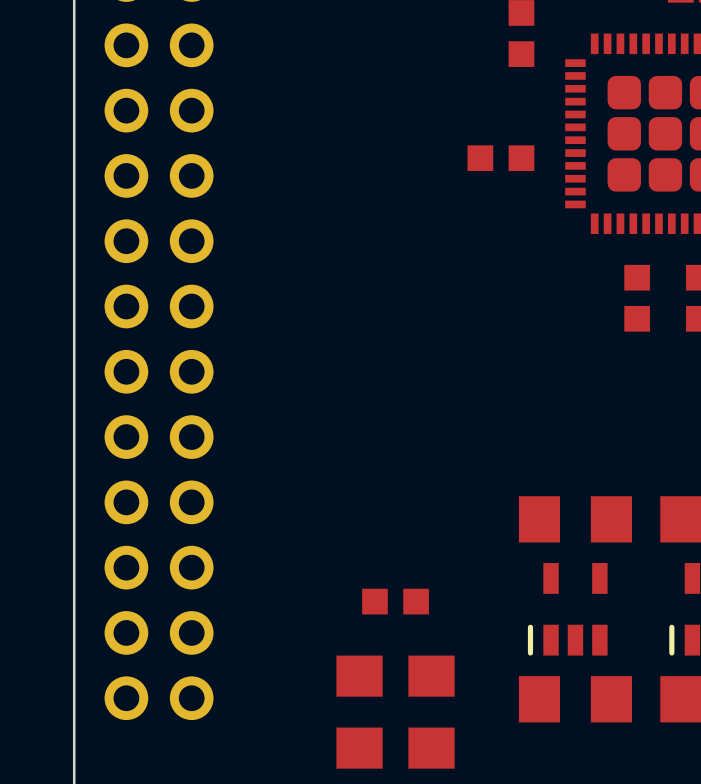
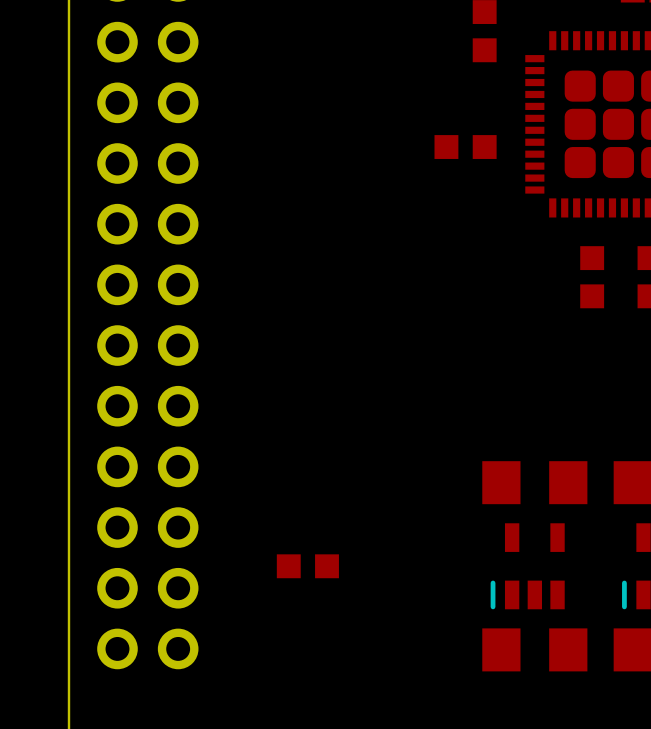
part position: (395, 601) -> (307, 566)
part: (359, 712) -> none
part: (431, 712) -> none

